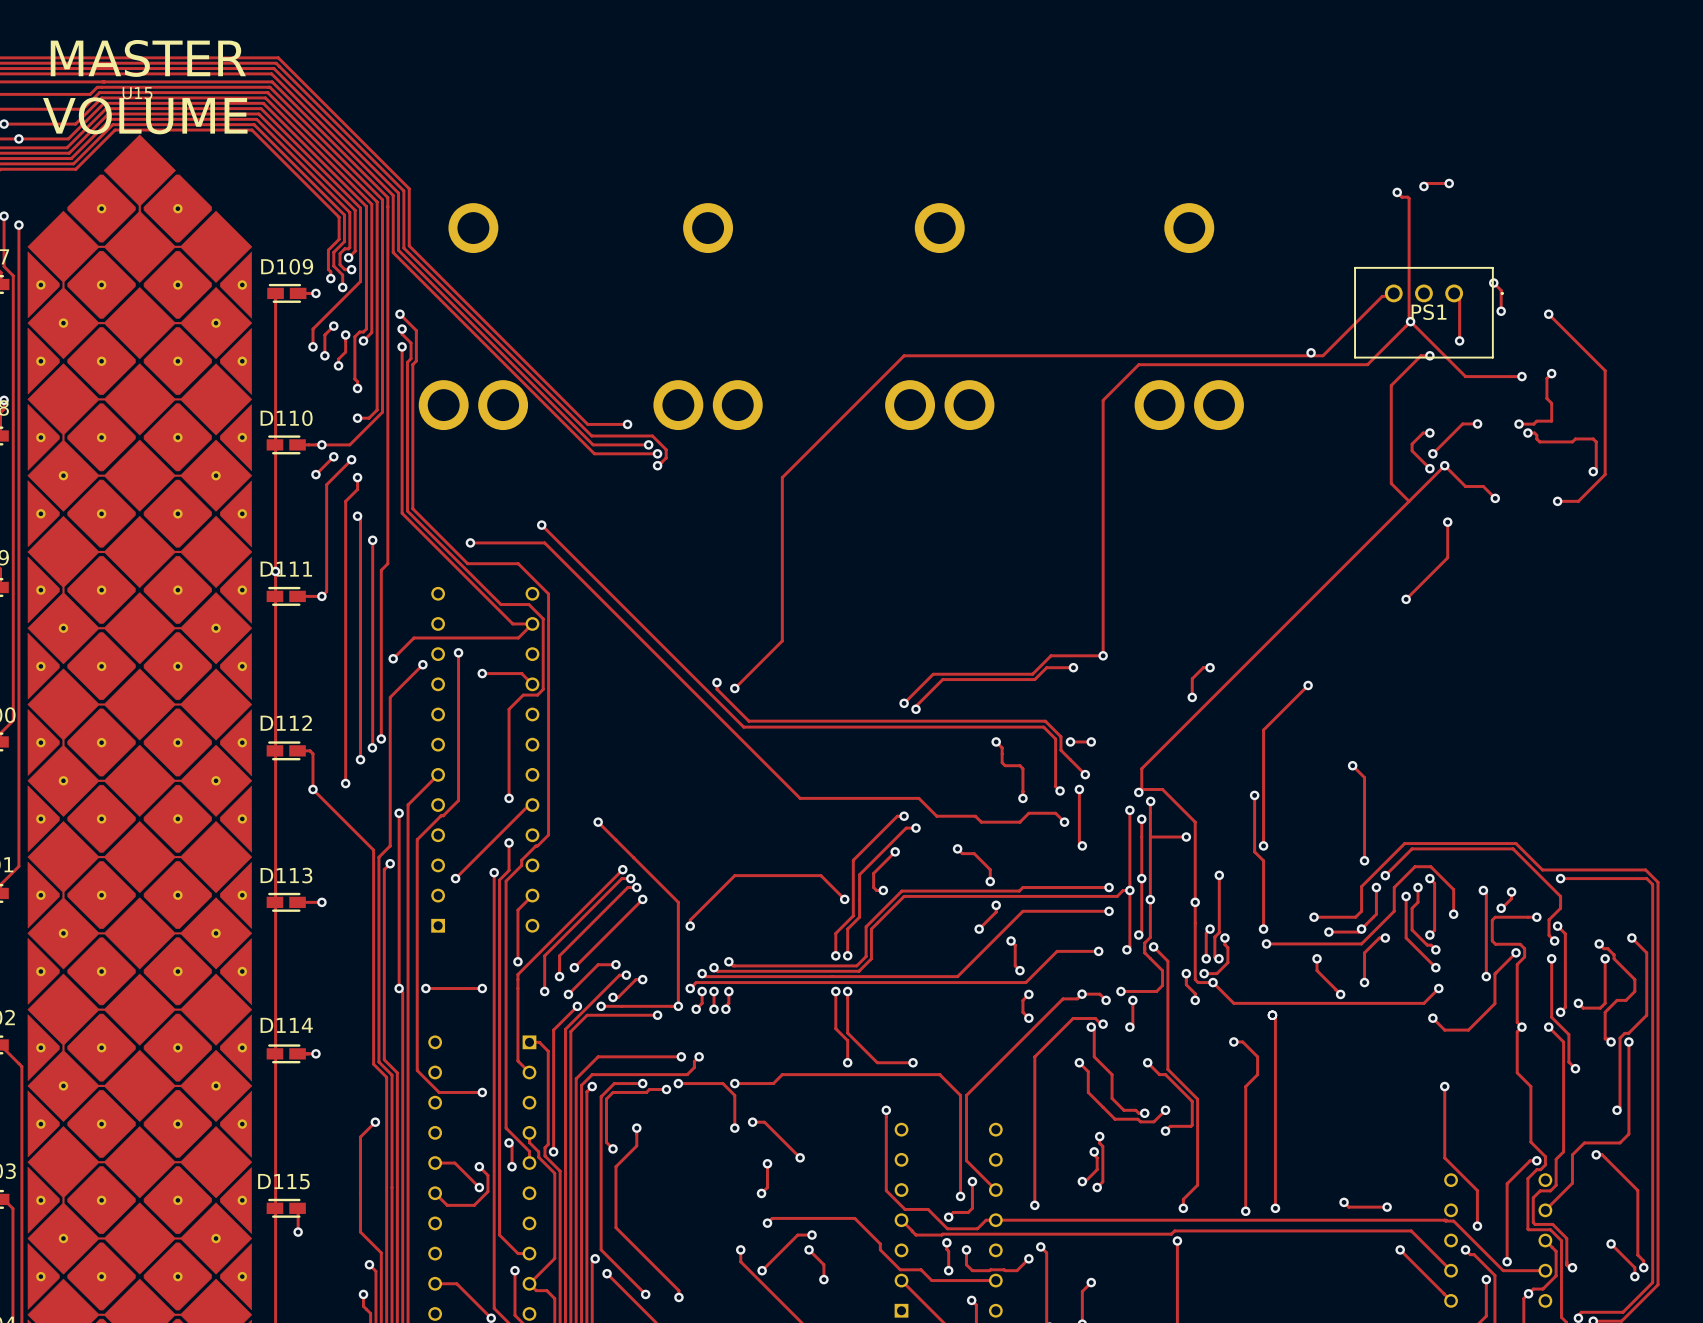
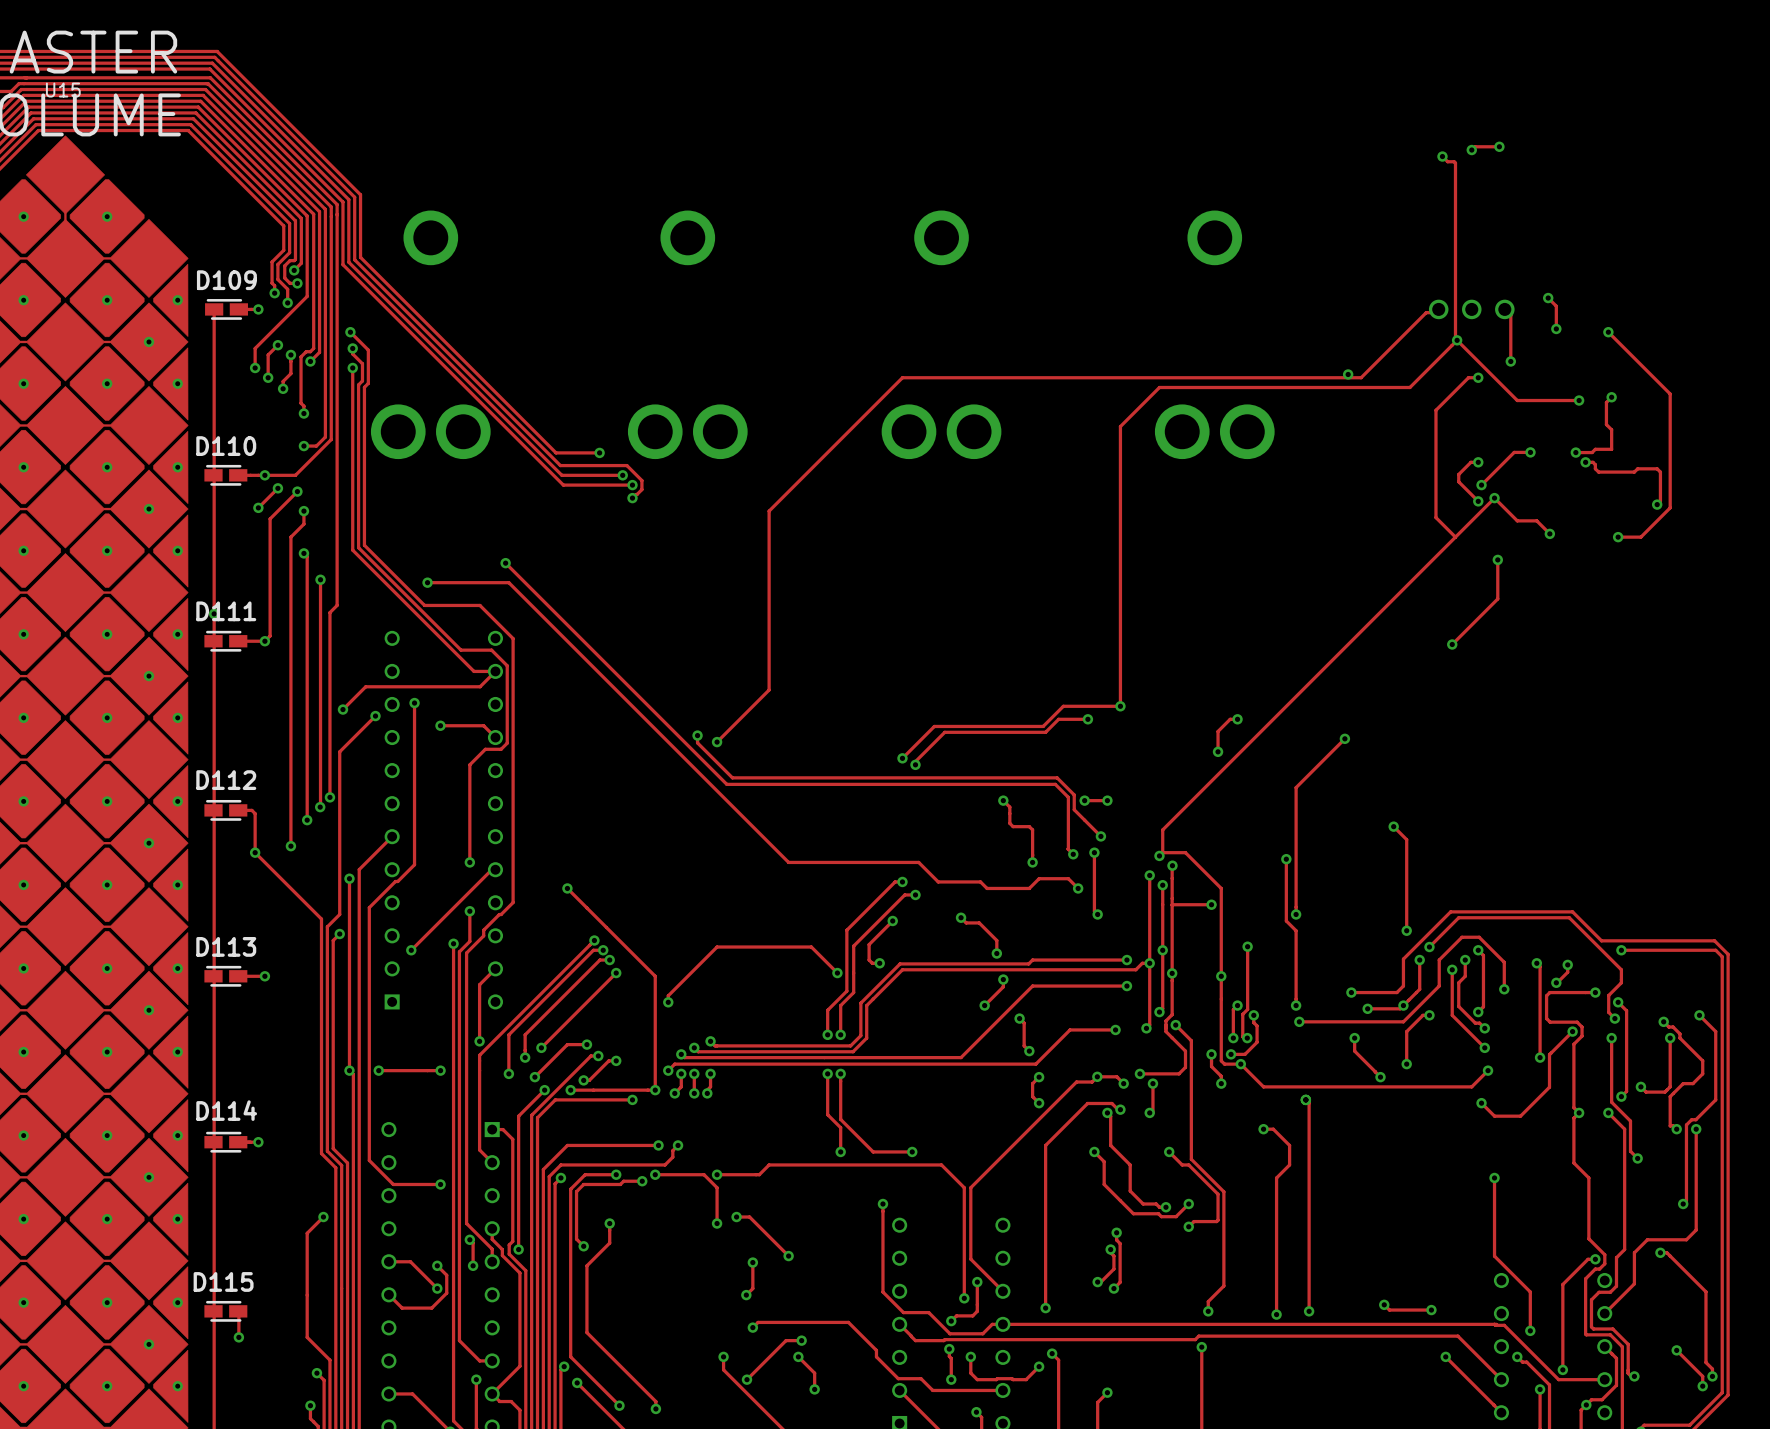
via: none -> (1499, 146)
via: none -> (1471, 150)
via: none -> (1442, 156)
track: (1449, 183) (1426, 183) (1423, 186) -> (1499, 146) (1475, 146) (1471, 150)
via: (1449, 183) -> none
via: (1423, 186) -> none
track: (1397, 192) (1401, 197) (1409, 198) -> (1442, 156) (1447, 161) (1455, 163) (1455, 205)
via: (1397, 192) -> none
PS1 side: top (1428, 312) -> bottom (1471, 309)

